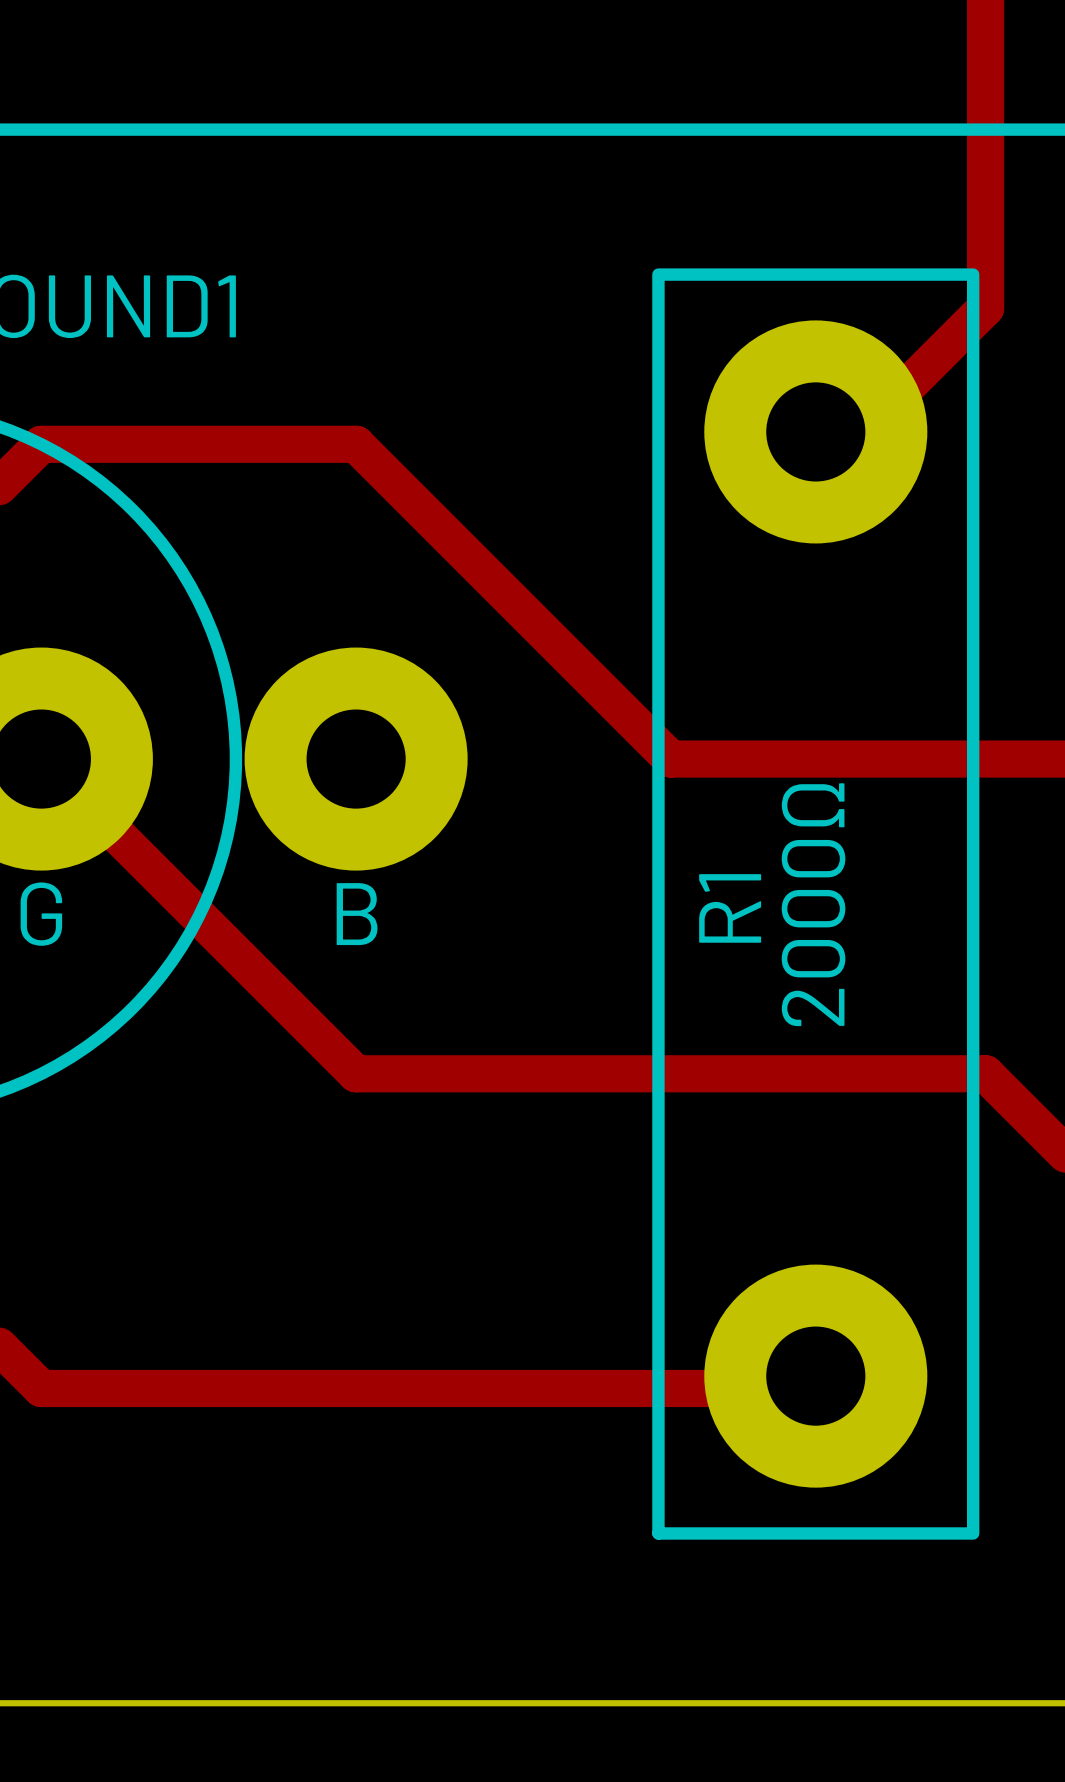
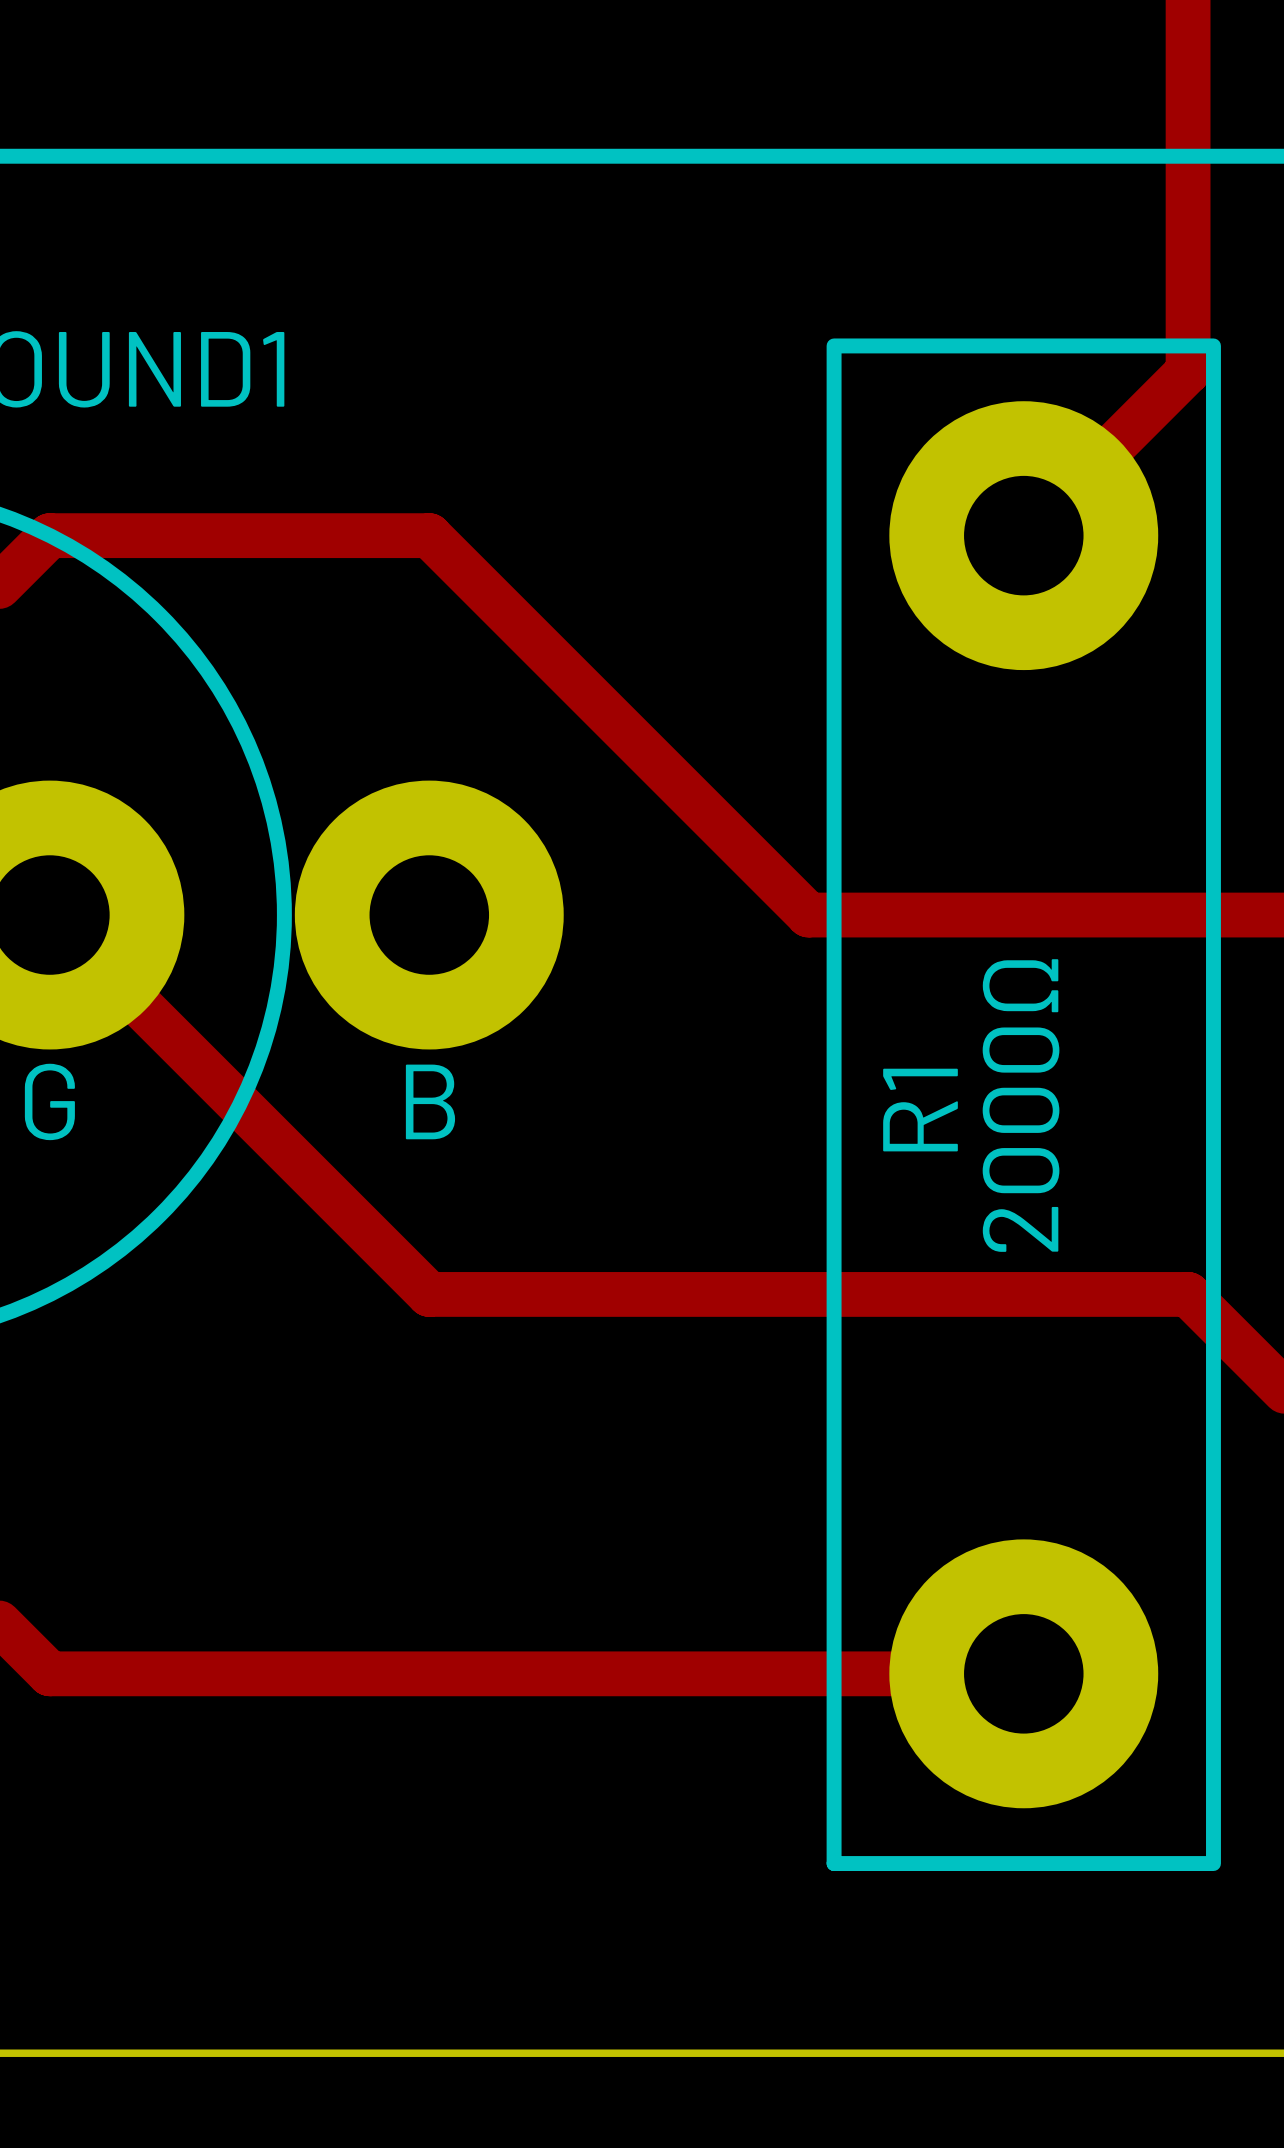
R1 position: (815, 904) -> (1023, 1104)

